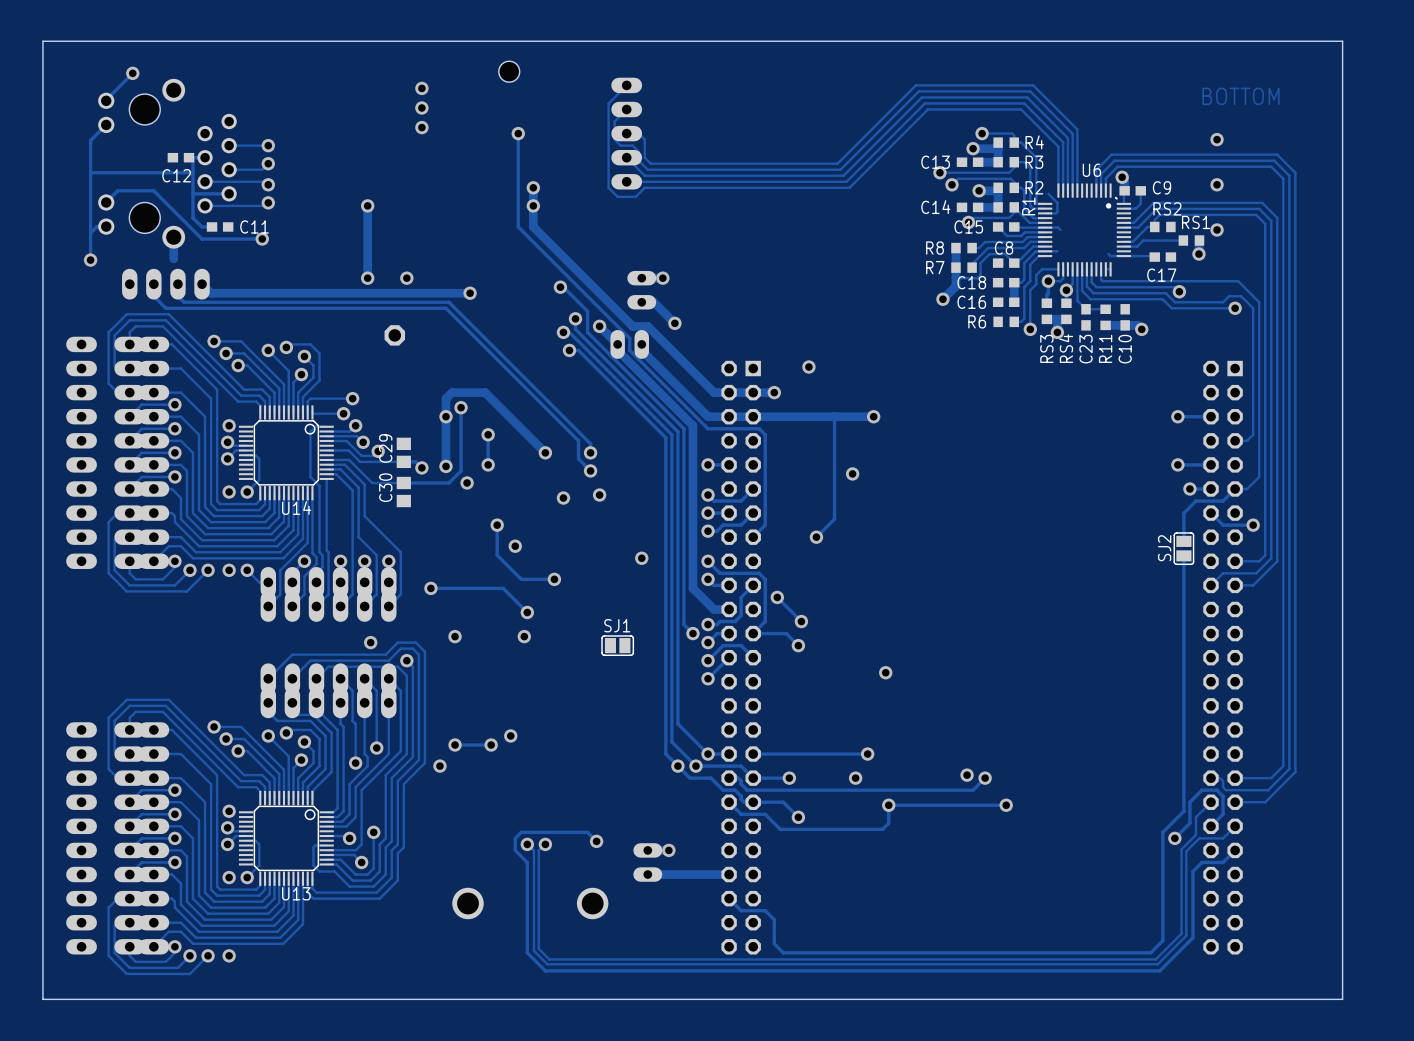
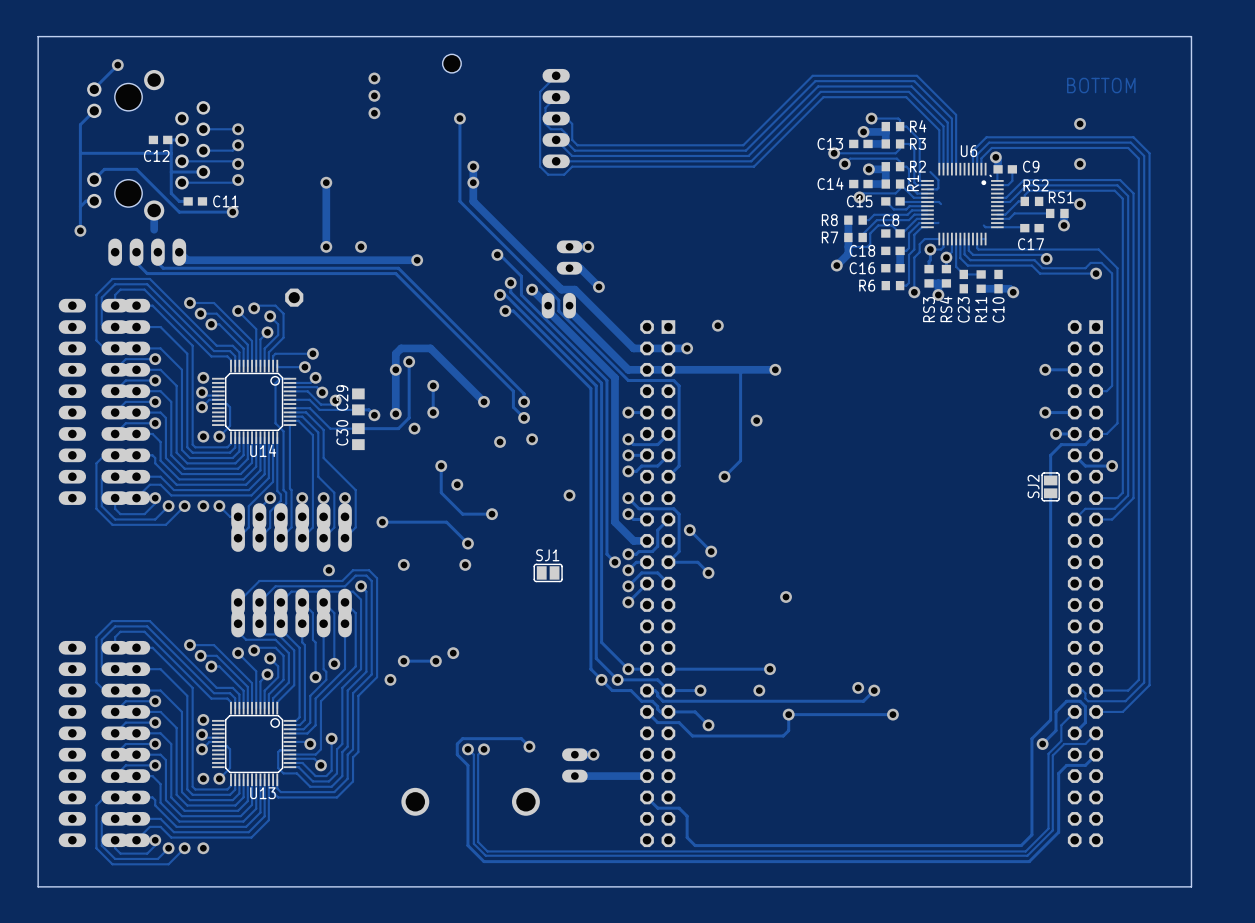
part position: (394, 335) -> (294, 297)

